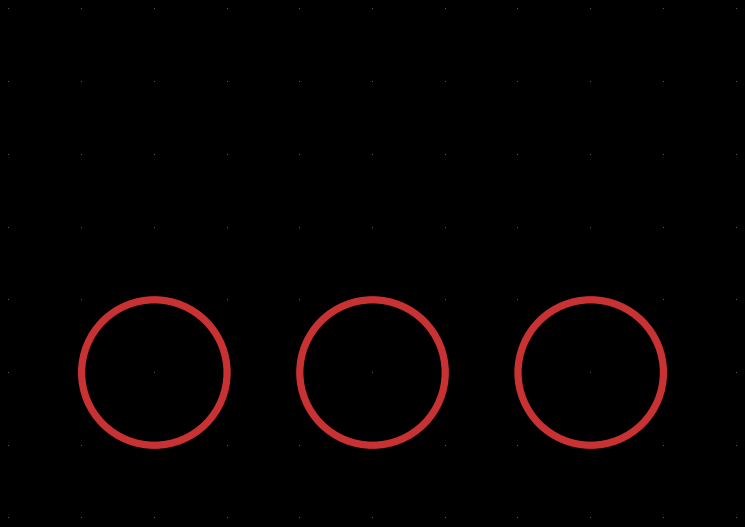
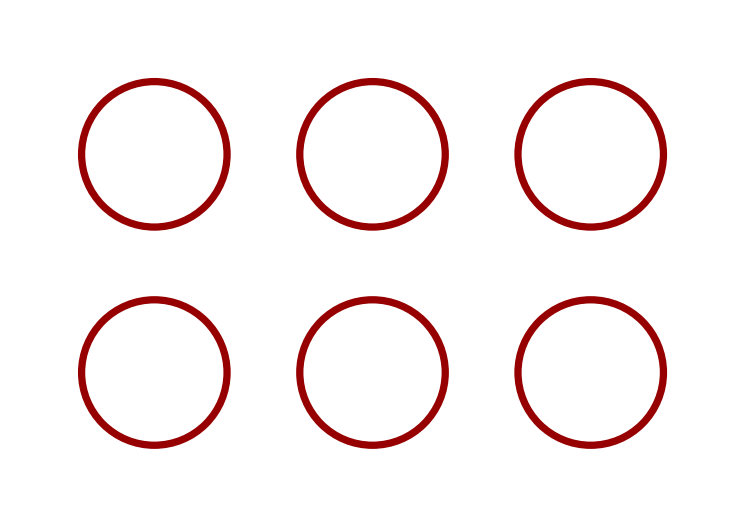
part: none -> (154, 154)
part: none -> (372, 154)
part: none -> (590, 154)

